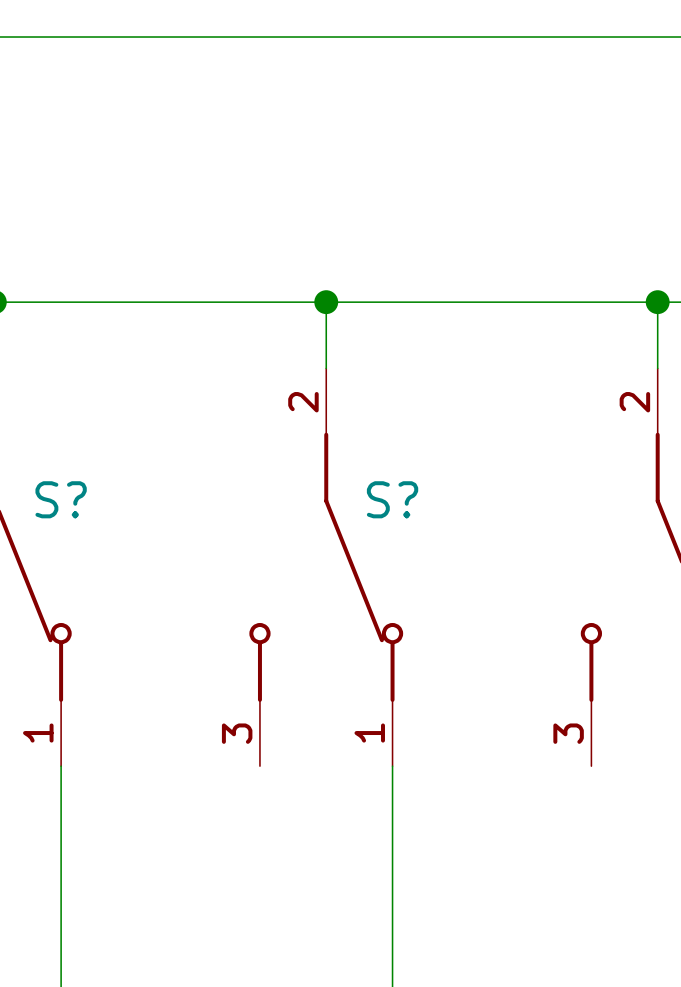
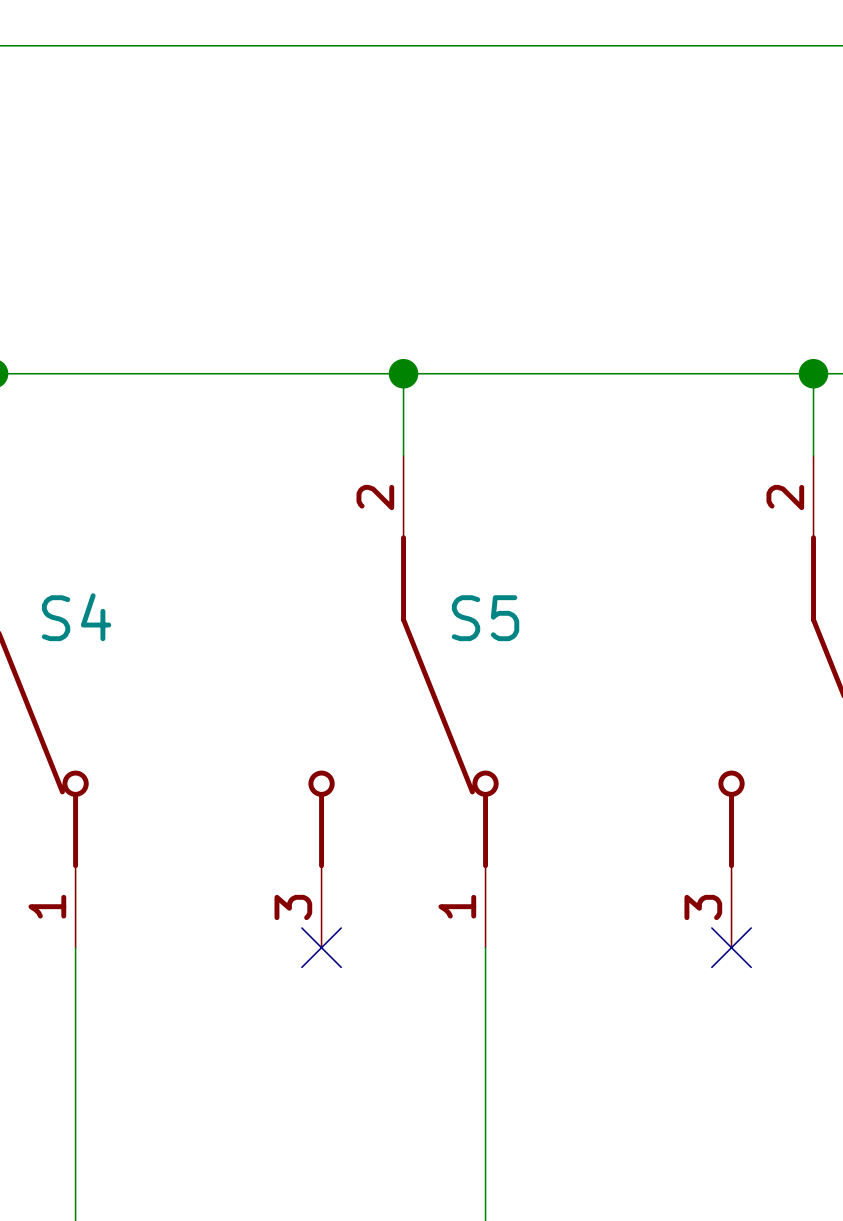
S? name: S? (61, 499) -> S4 (76, 617)
S? name: S? (392, 499) -> S5 (485, 618)
no-connect mark: none -> (321, 947)
no-connect mark: none -> (731, 947)

